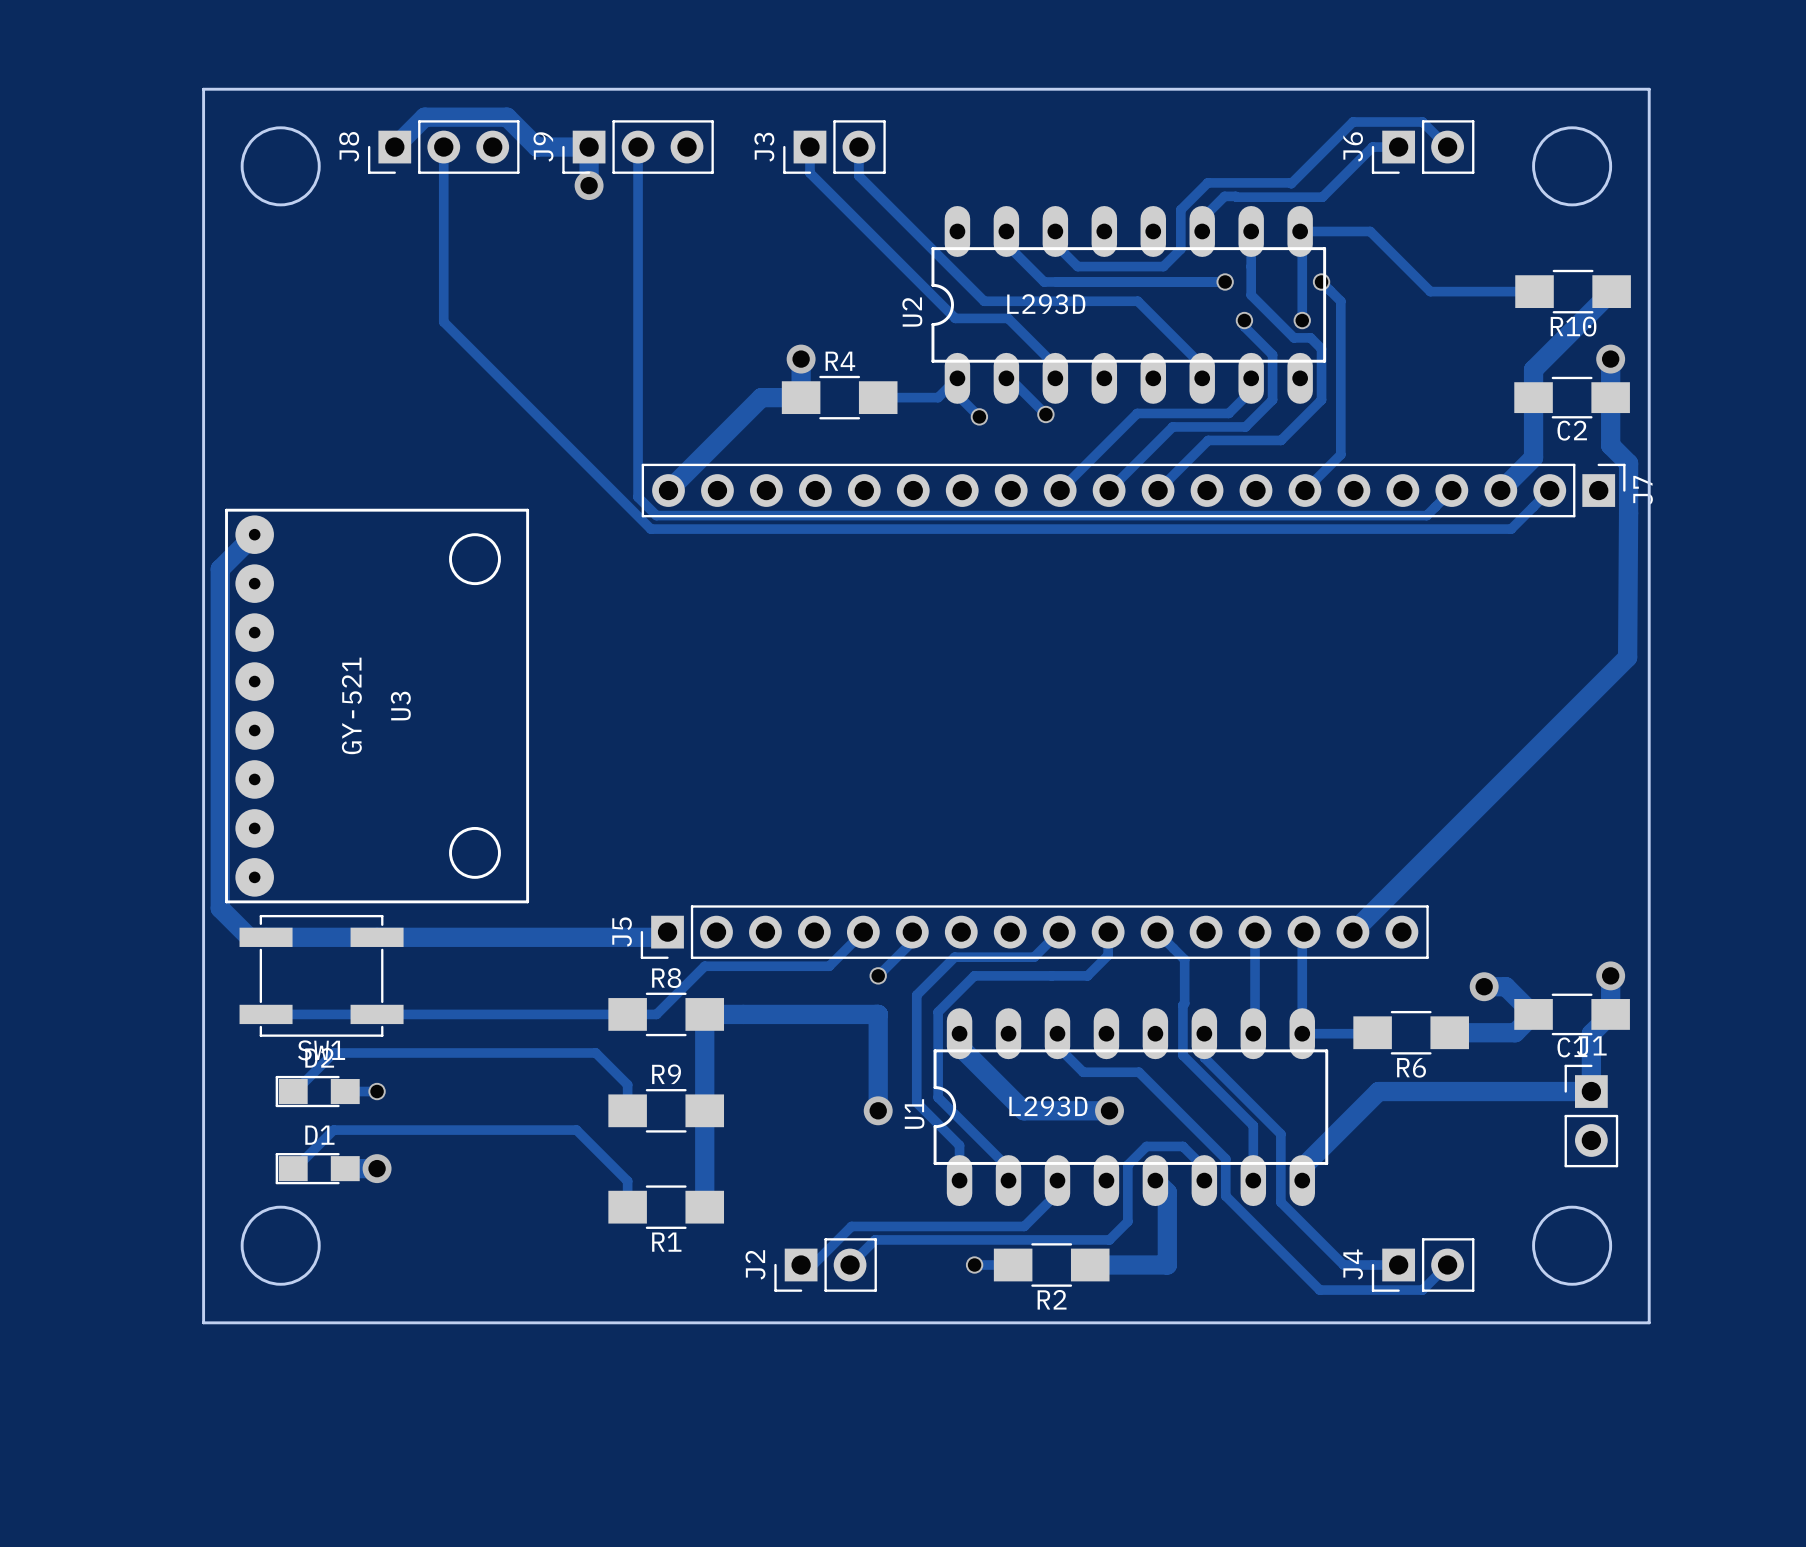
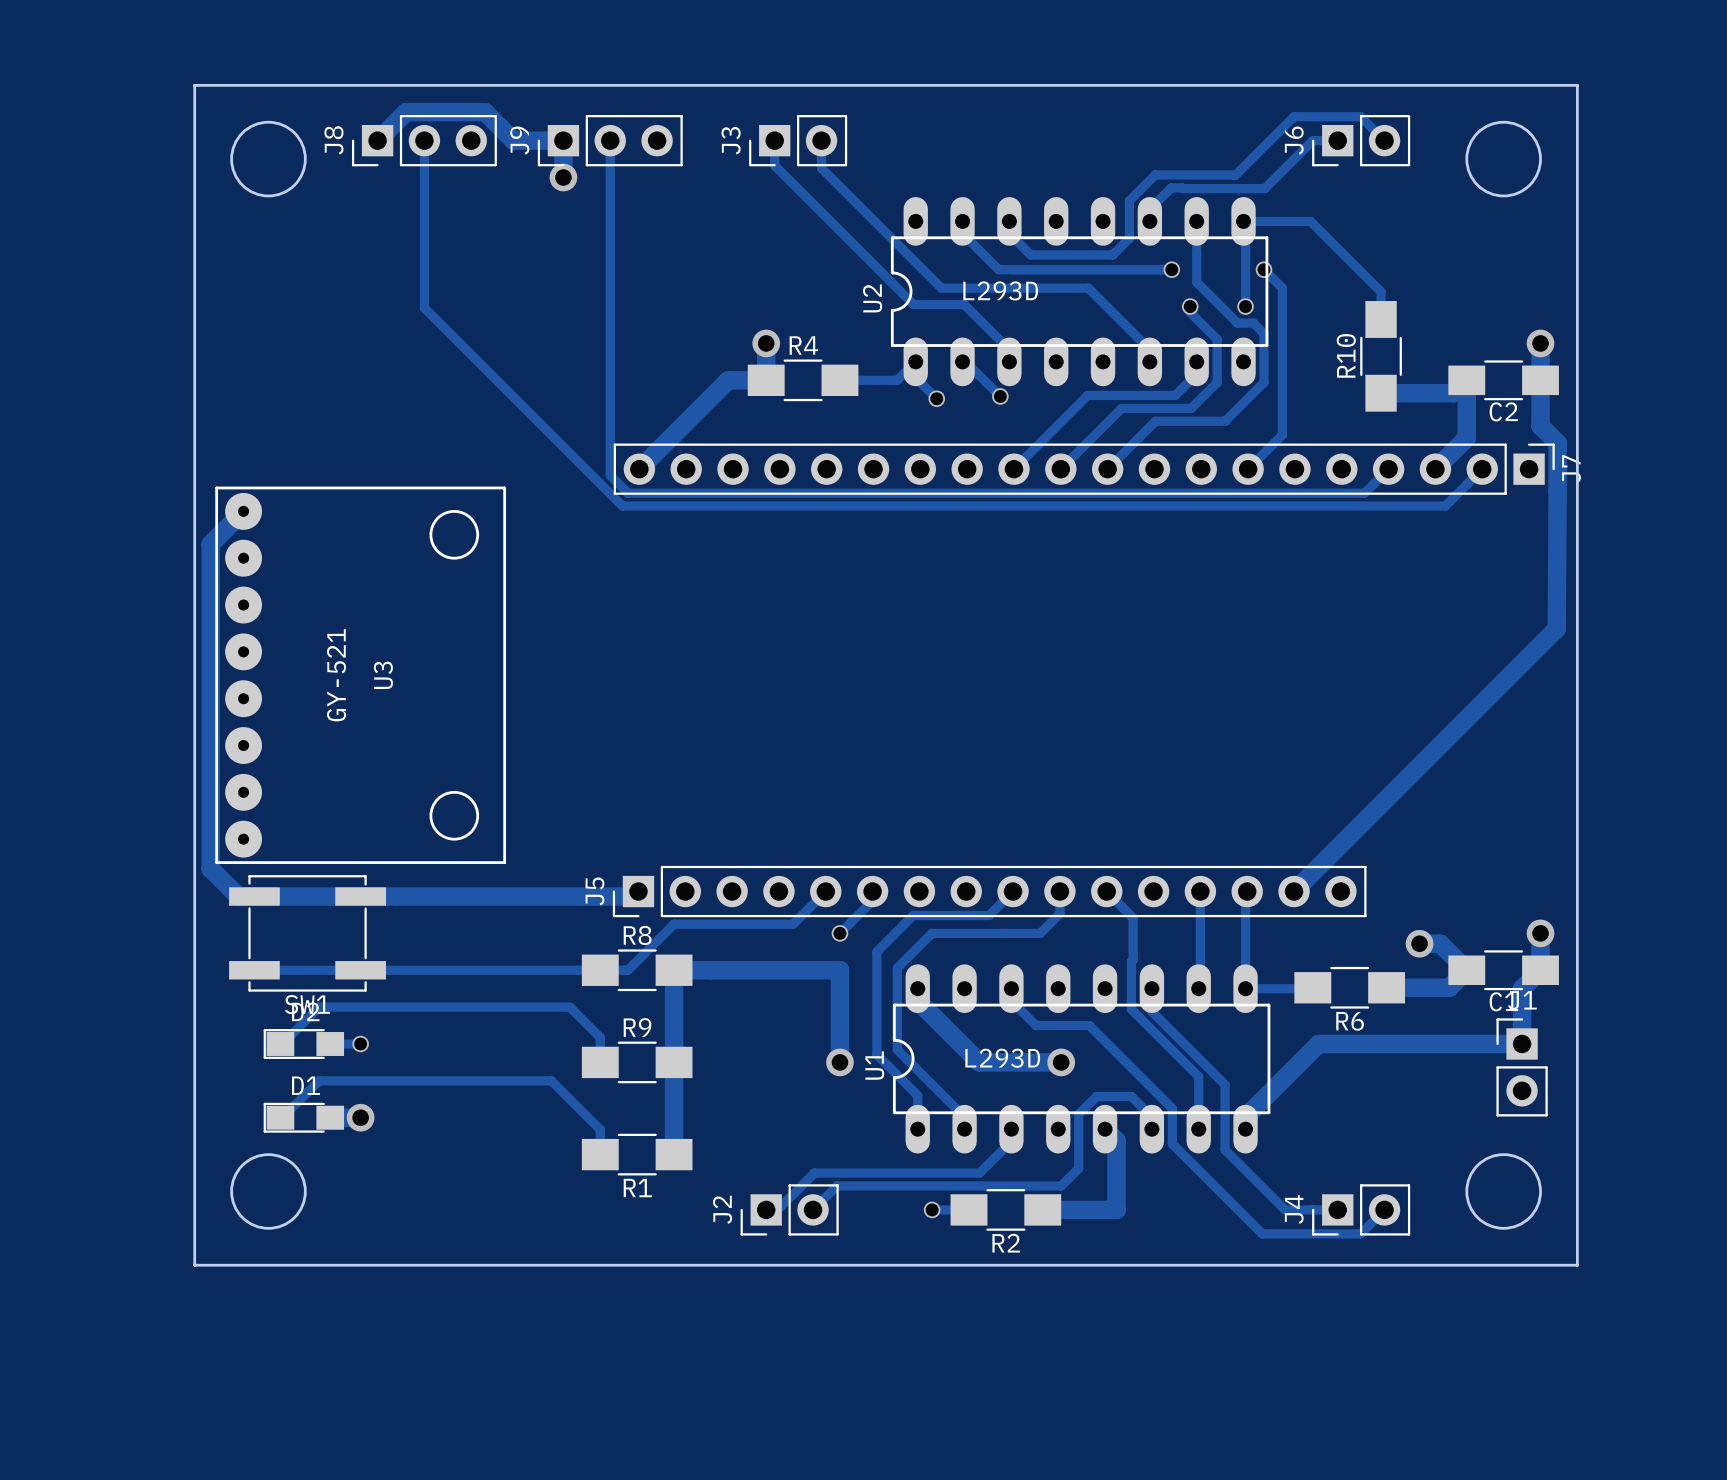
track: (1430, 291) (1534, 291) -> (1368, 278) (1381, 291) (1381, 319)
R10 rotation: 0° (1573, 291) -> 90° clockwise (1381, 356)
R10 position: (1573, 291) -> (1381, 356)
track: (1608, 291) (1611, 291) (1533, 369) (1533, 397) -> (1381, 393) (1453, 393) (1466, 380)

